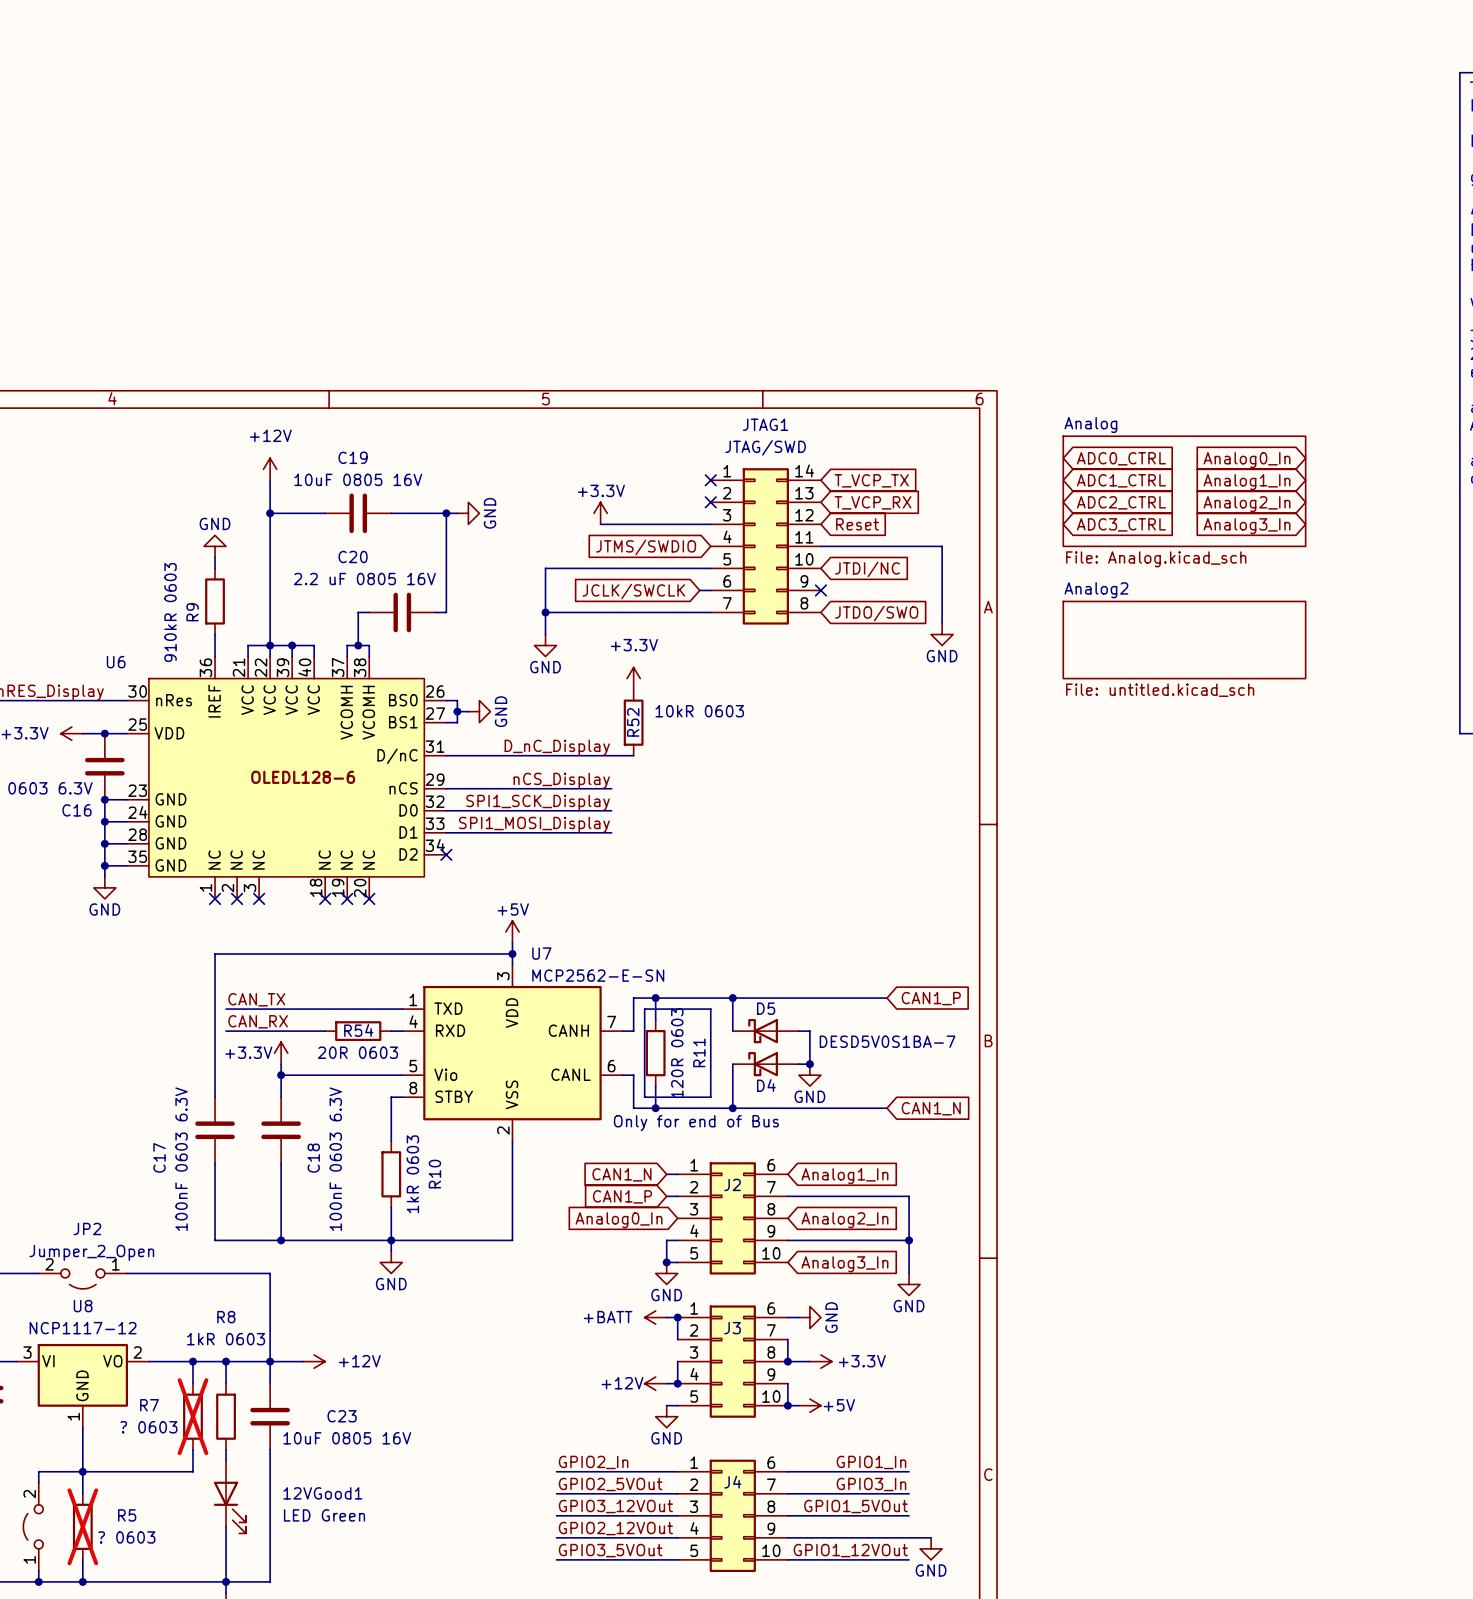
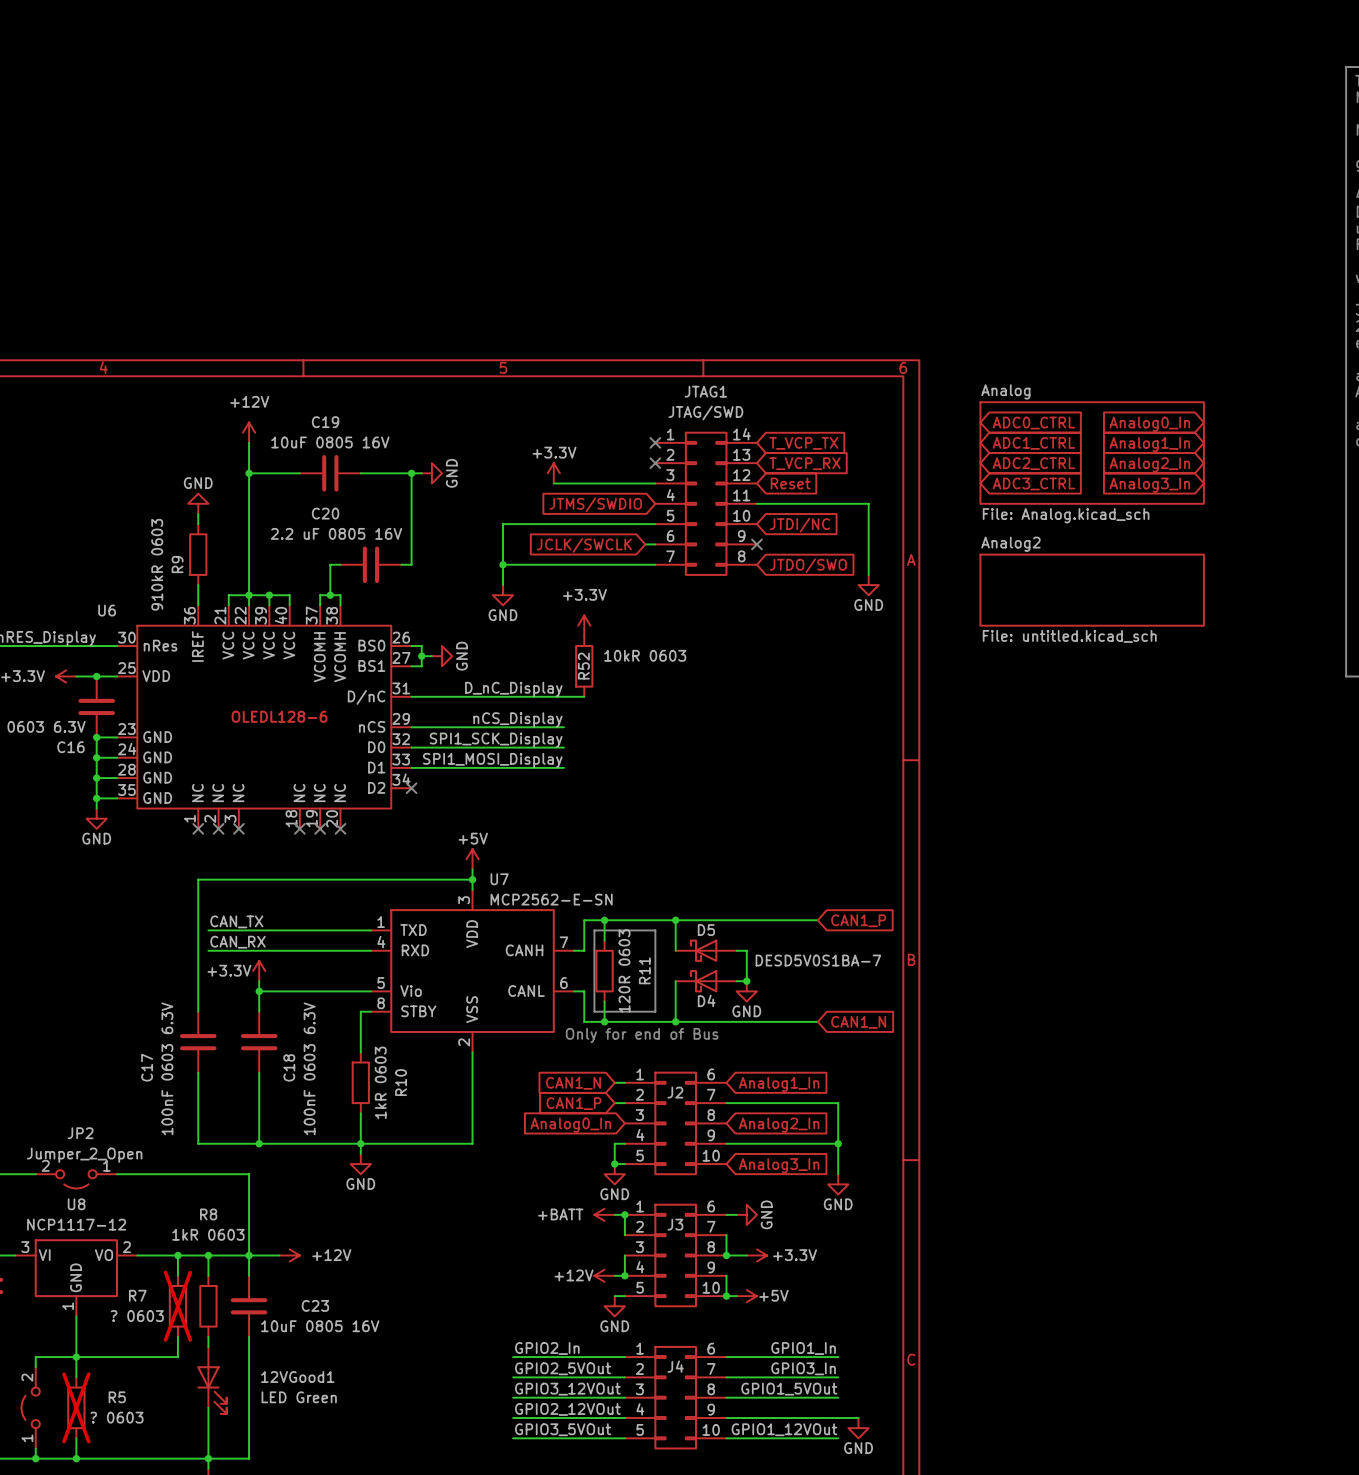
R54: 20R 0603 (358, 1031) -> none

